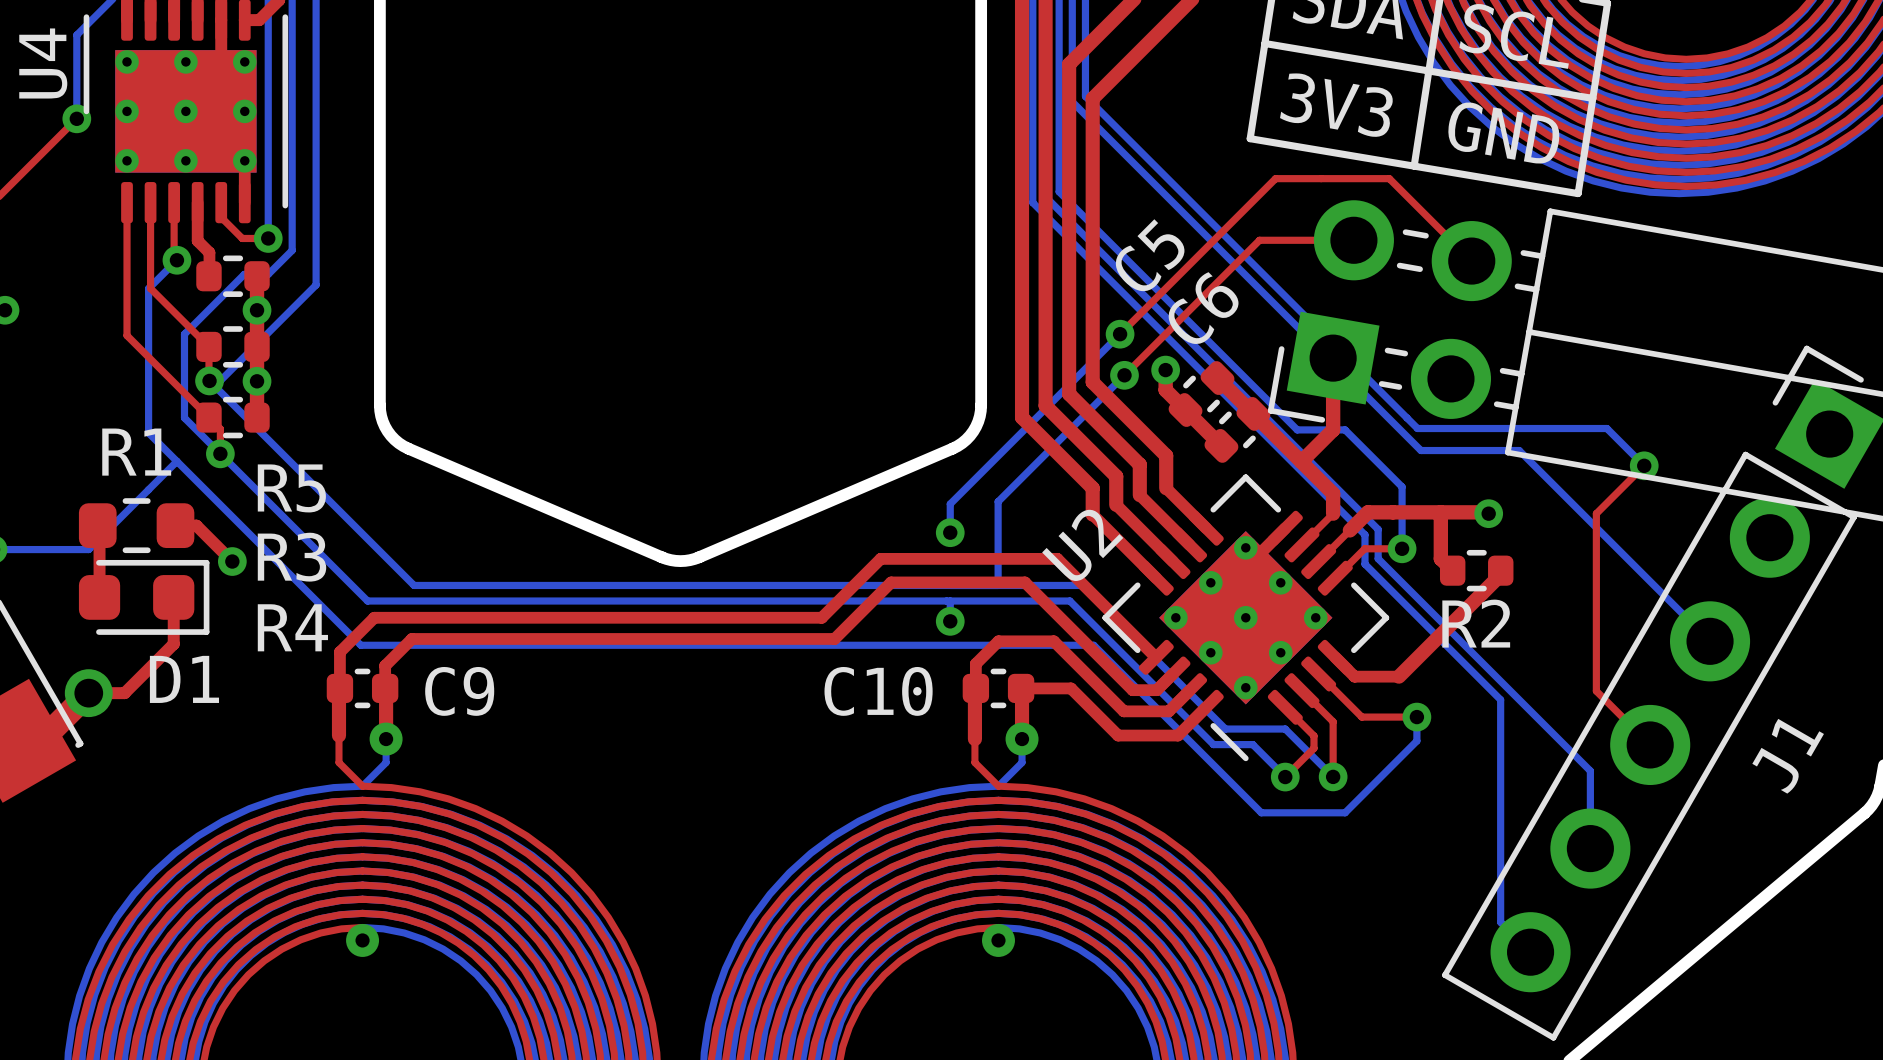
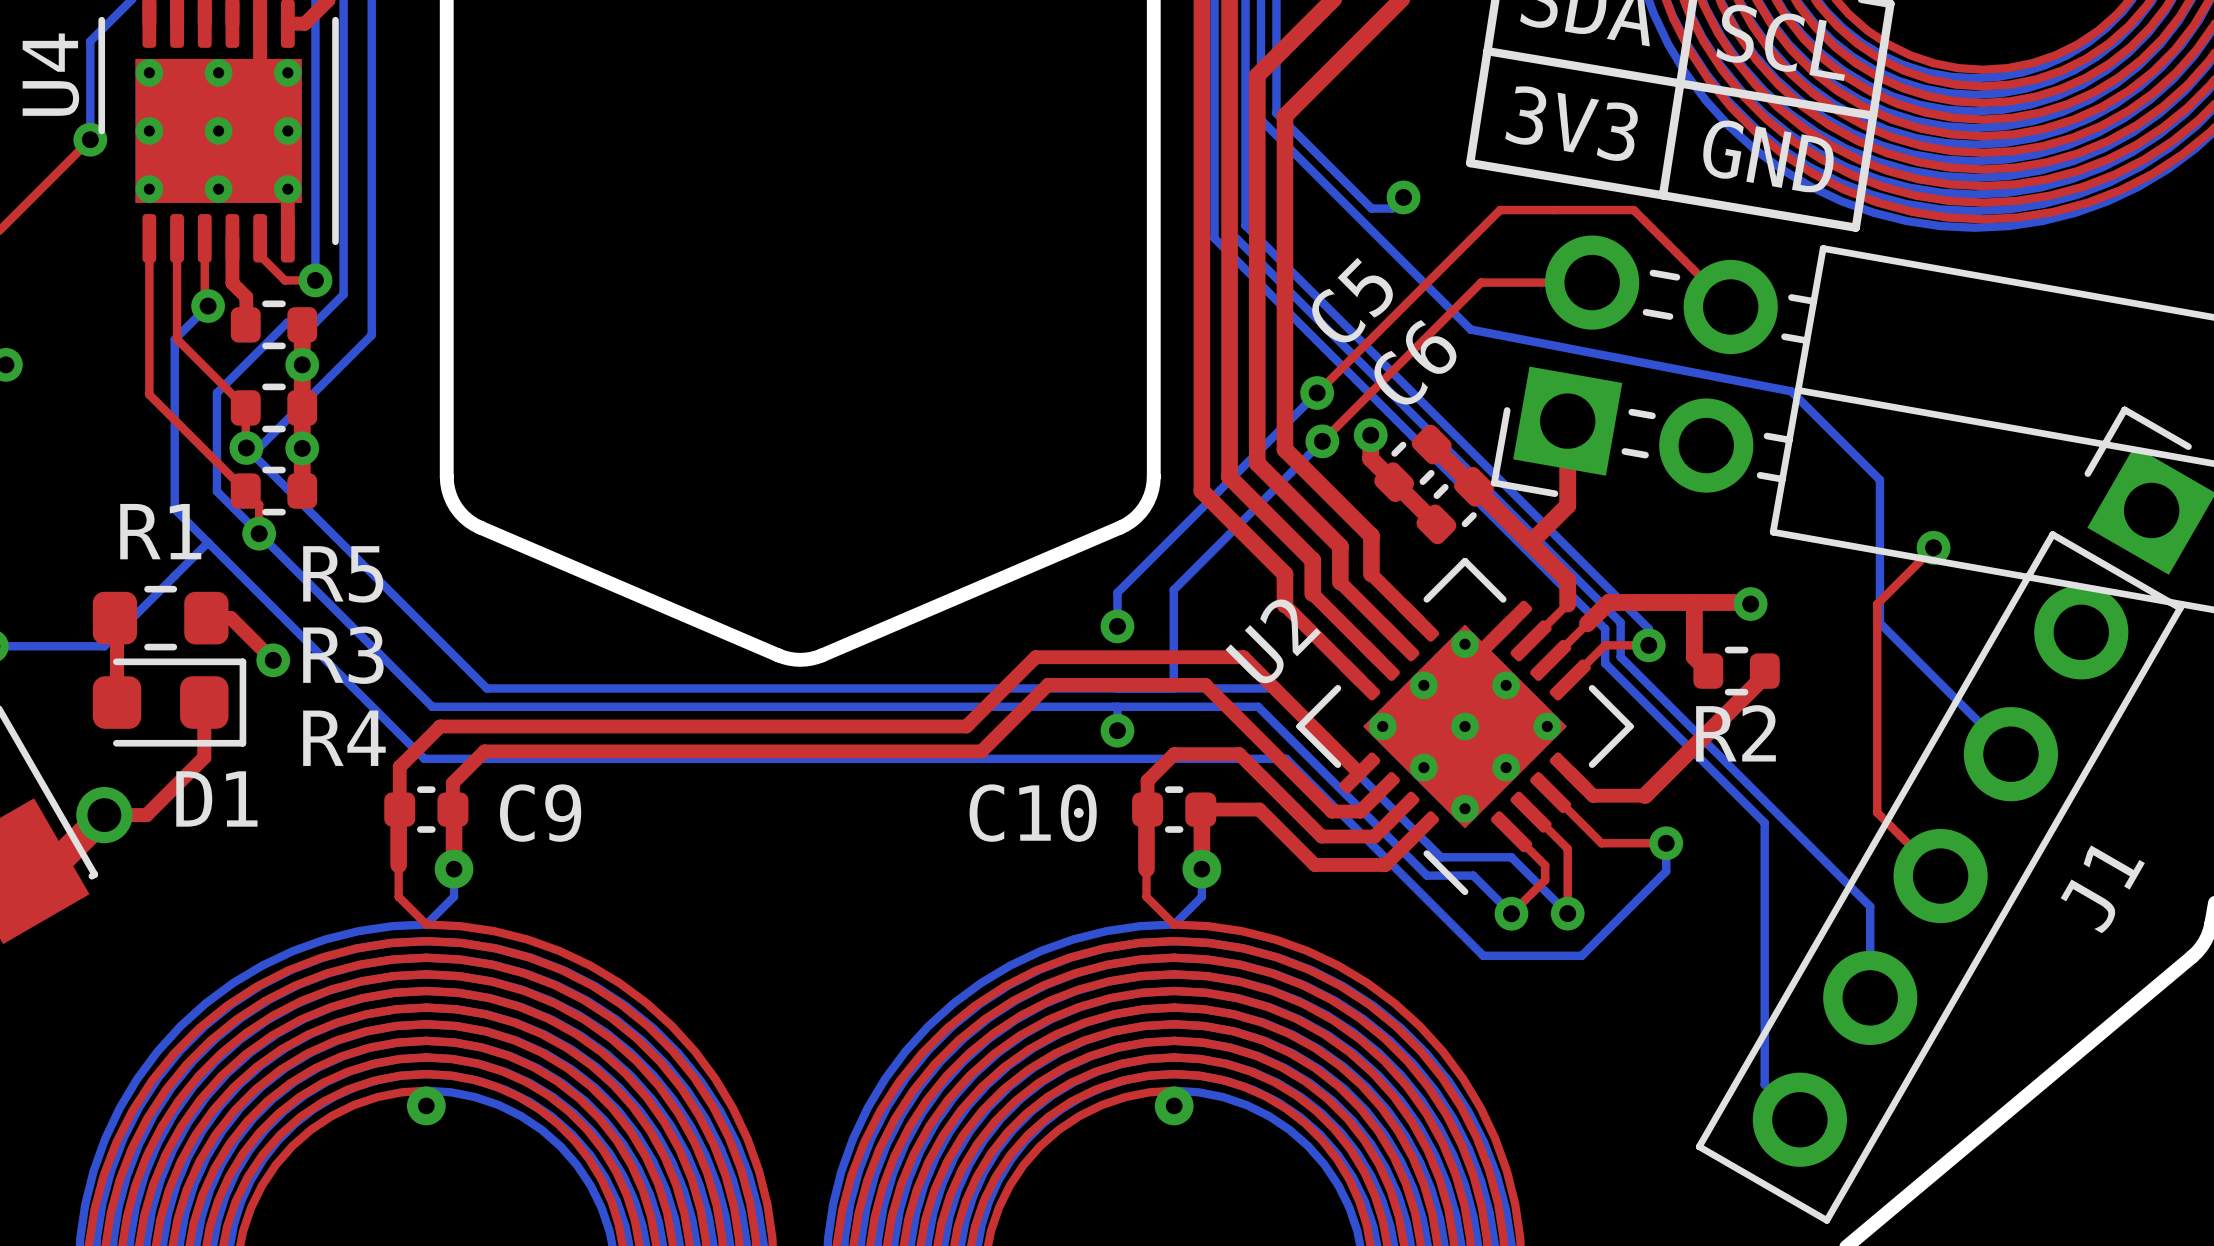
via: none -> (1403, 197)
bottom track: (1166, 177) (1417, 428) (1606, 428) (1644, 465) -> (1371, 208) (1392, 208) (1403, 197)
bottom track: (1250, 280) (1420, 450) (1519, 450) (1598, 529) -> (1470, 329) (1791, 391) (1879, 479) (1879, 623)
bottom track: (1297, 429) (1345, 429) (1402, 486) (1402, 534) -> (1525, 505) (1648, 628)

